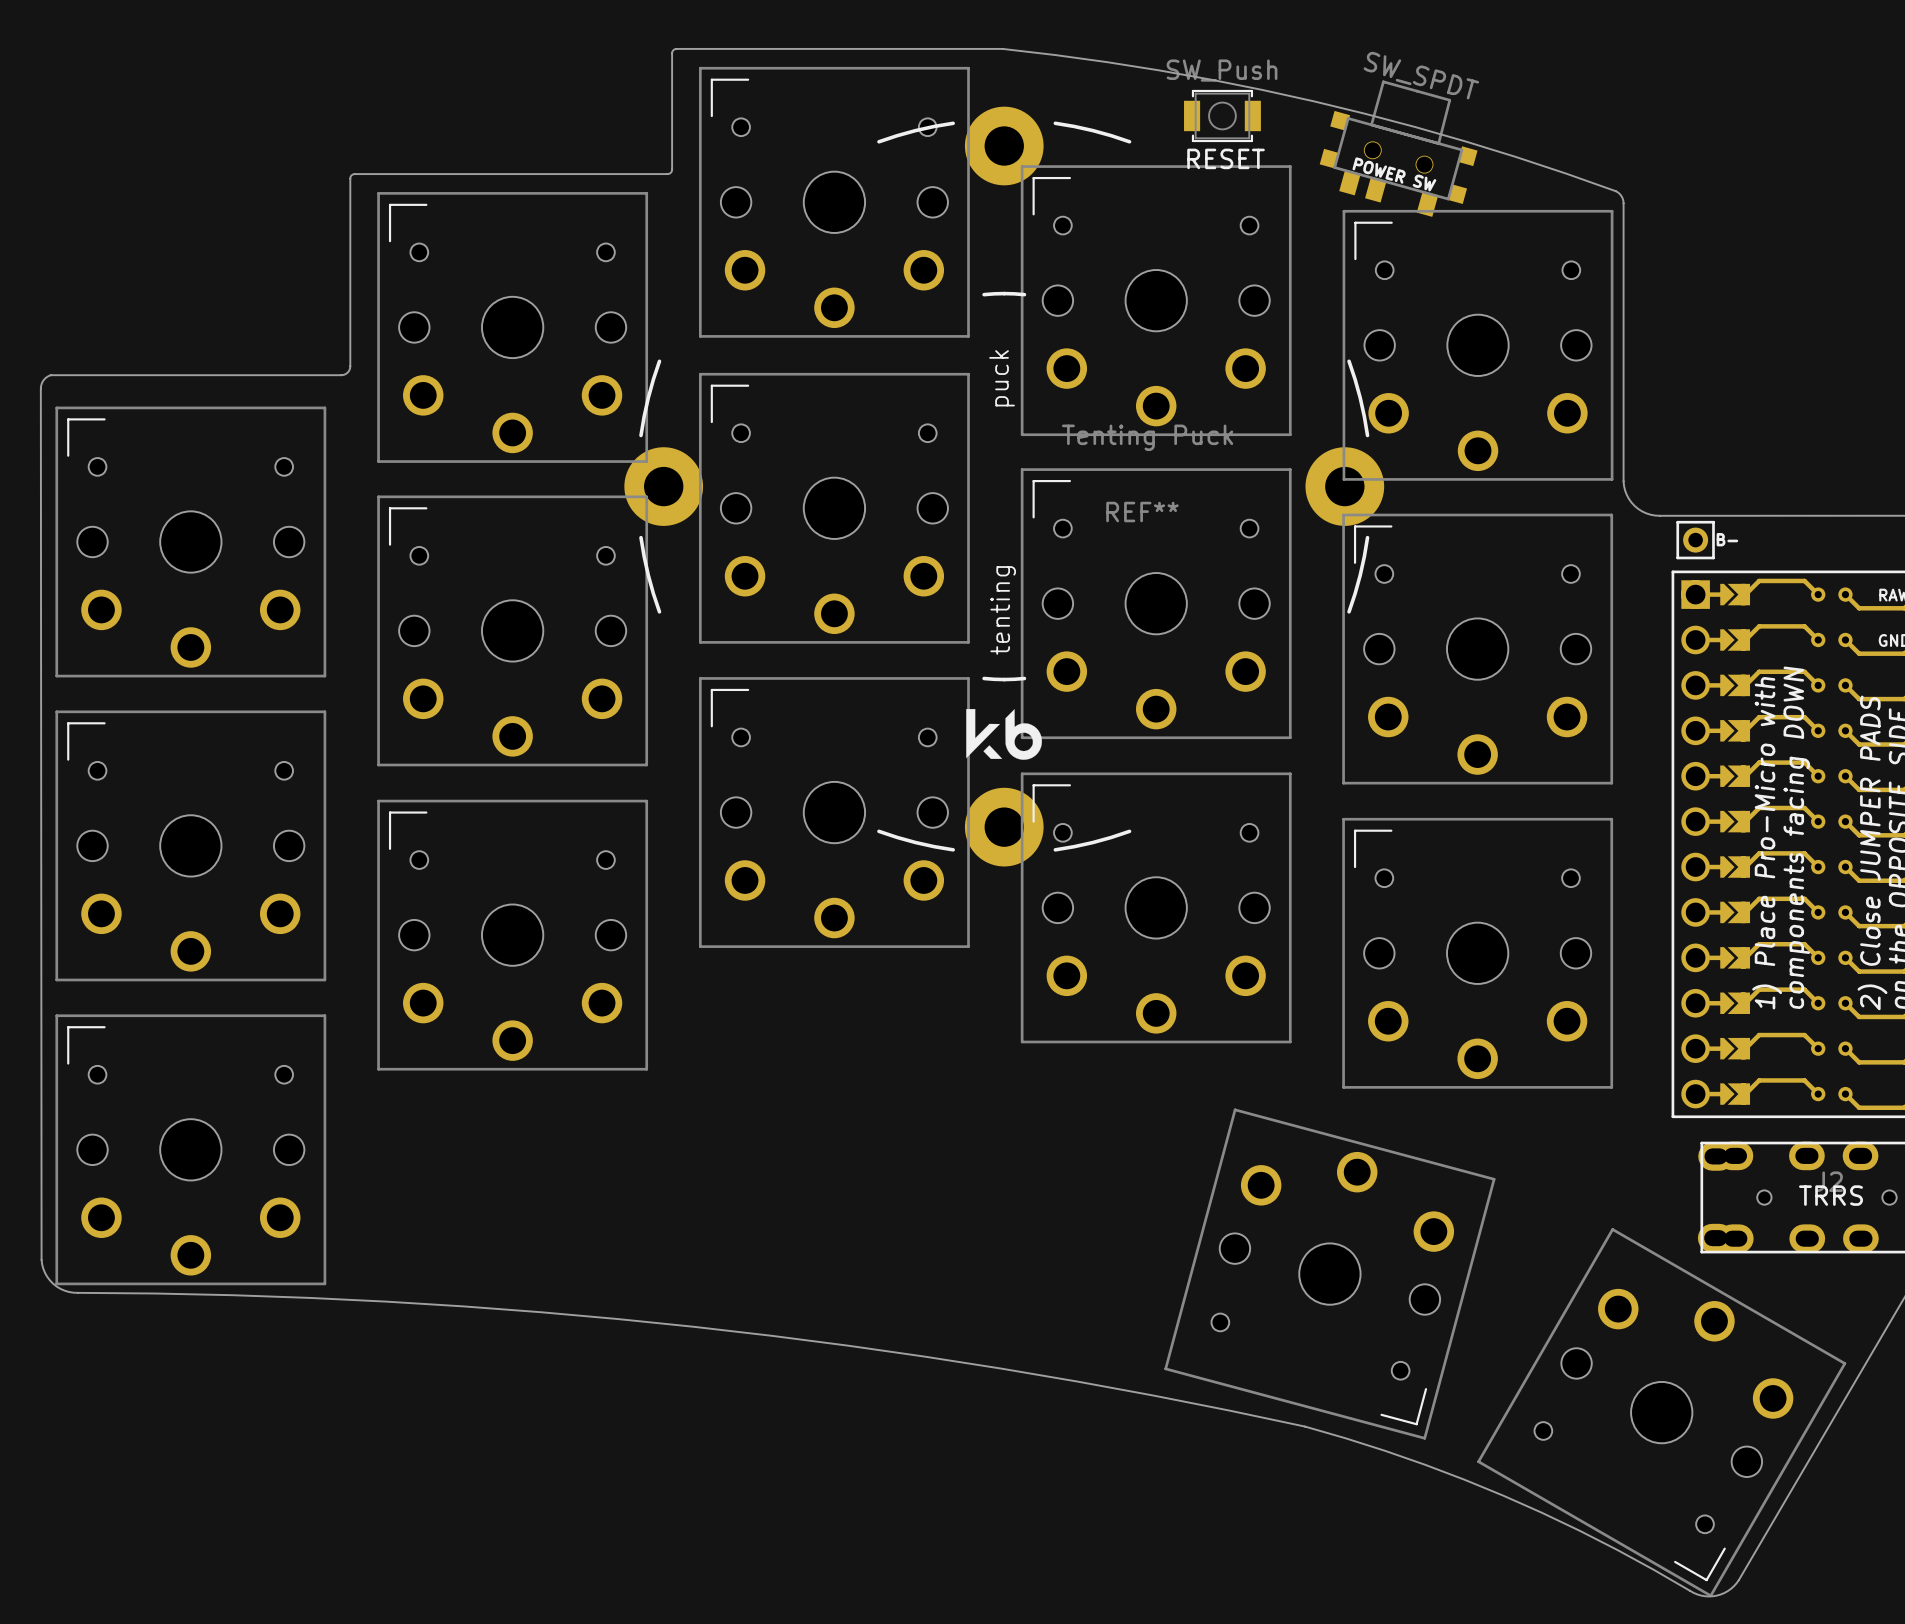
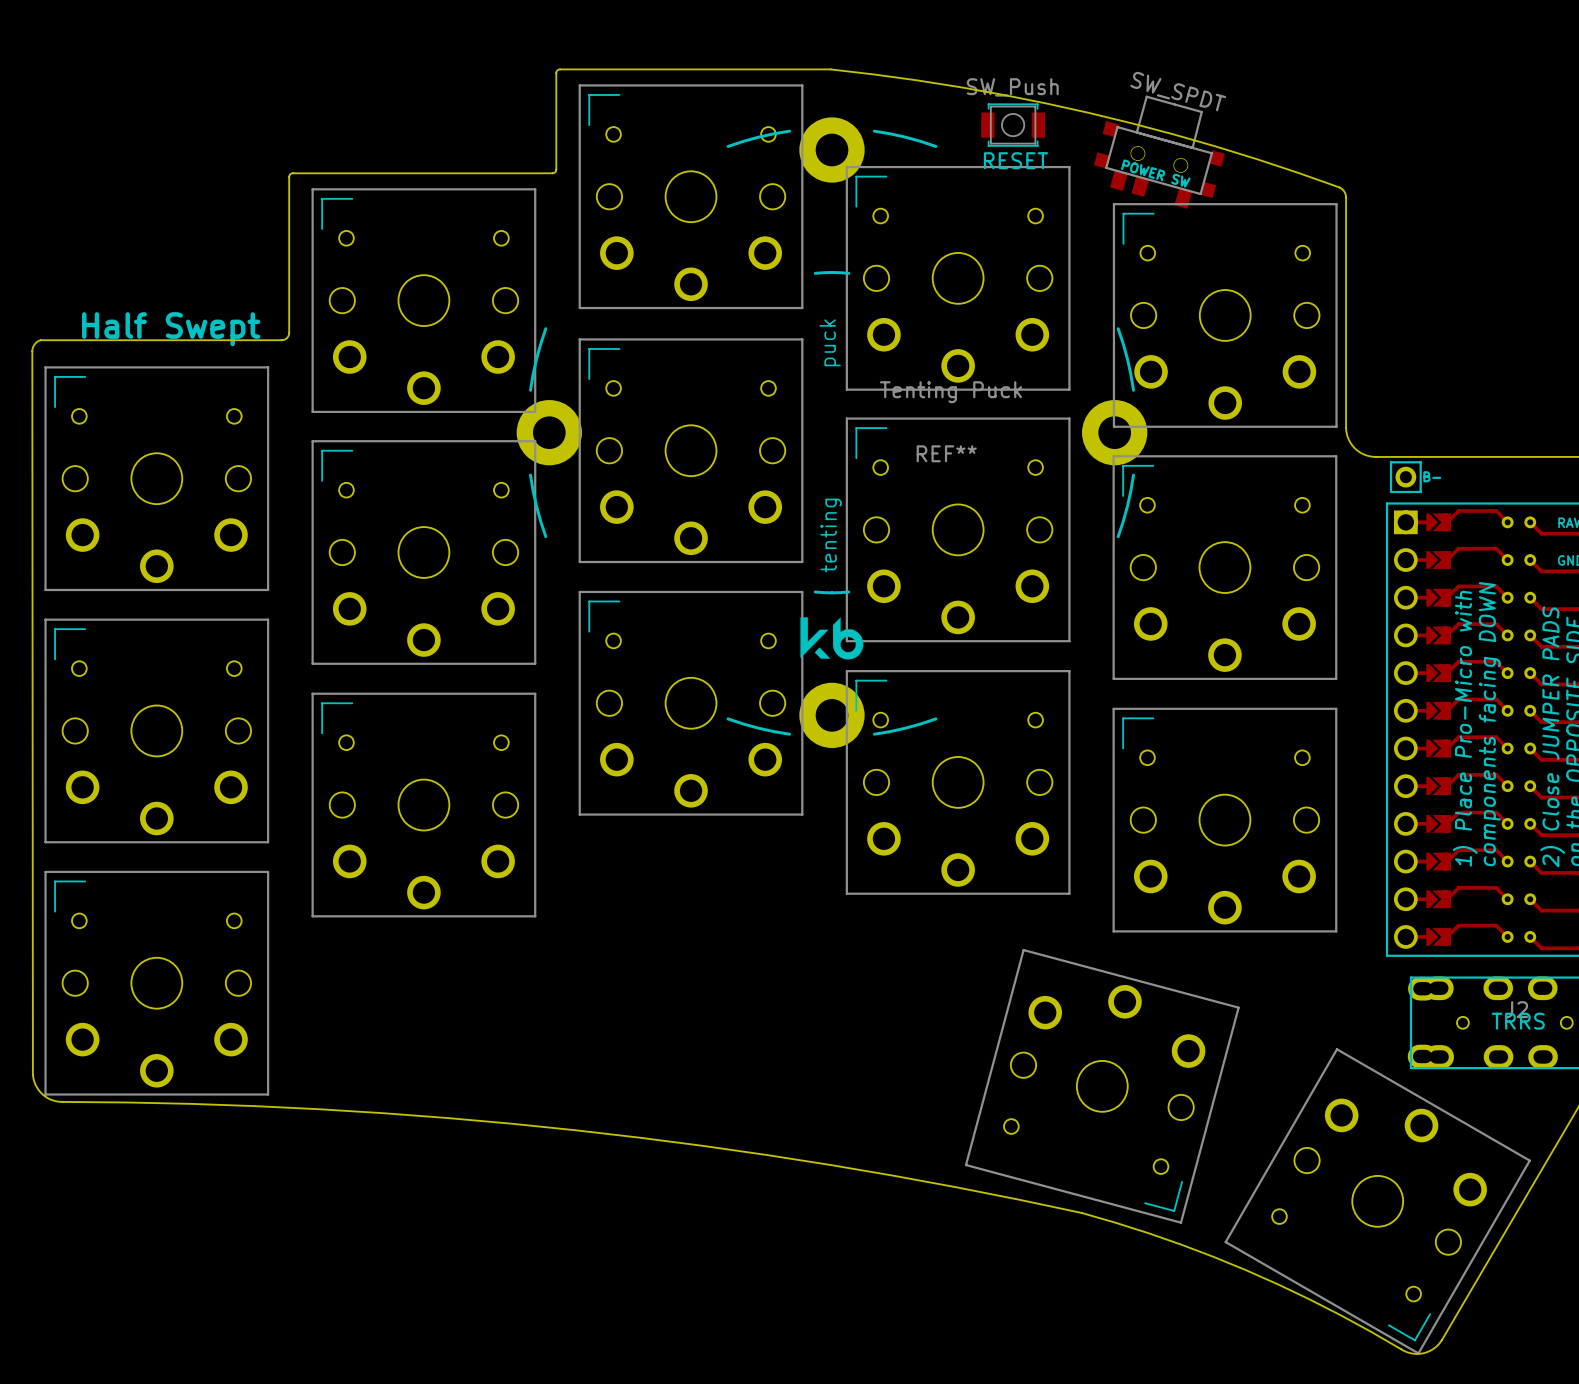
text: none -> Half Swept (171, 329)

